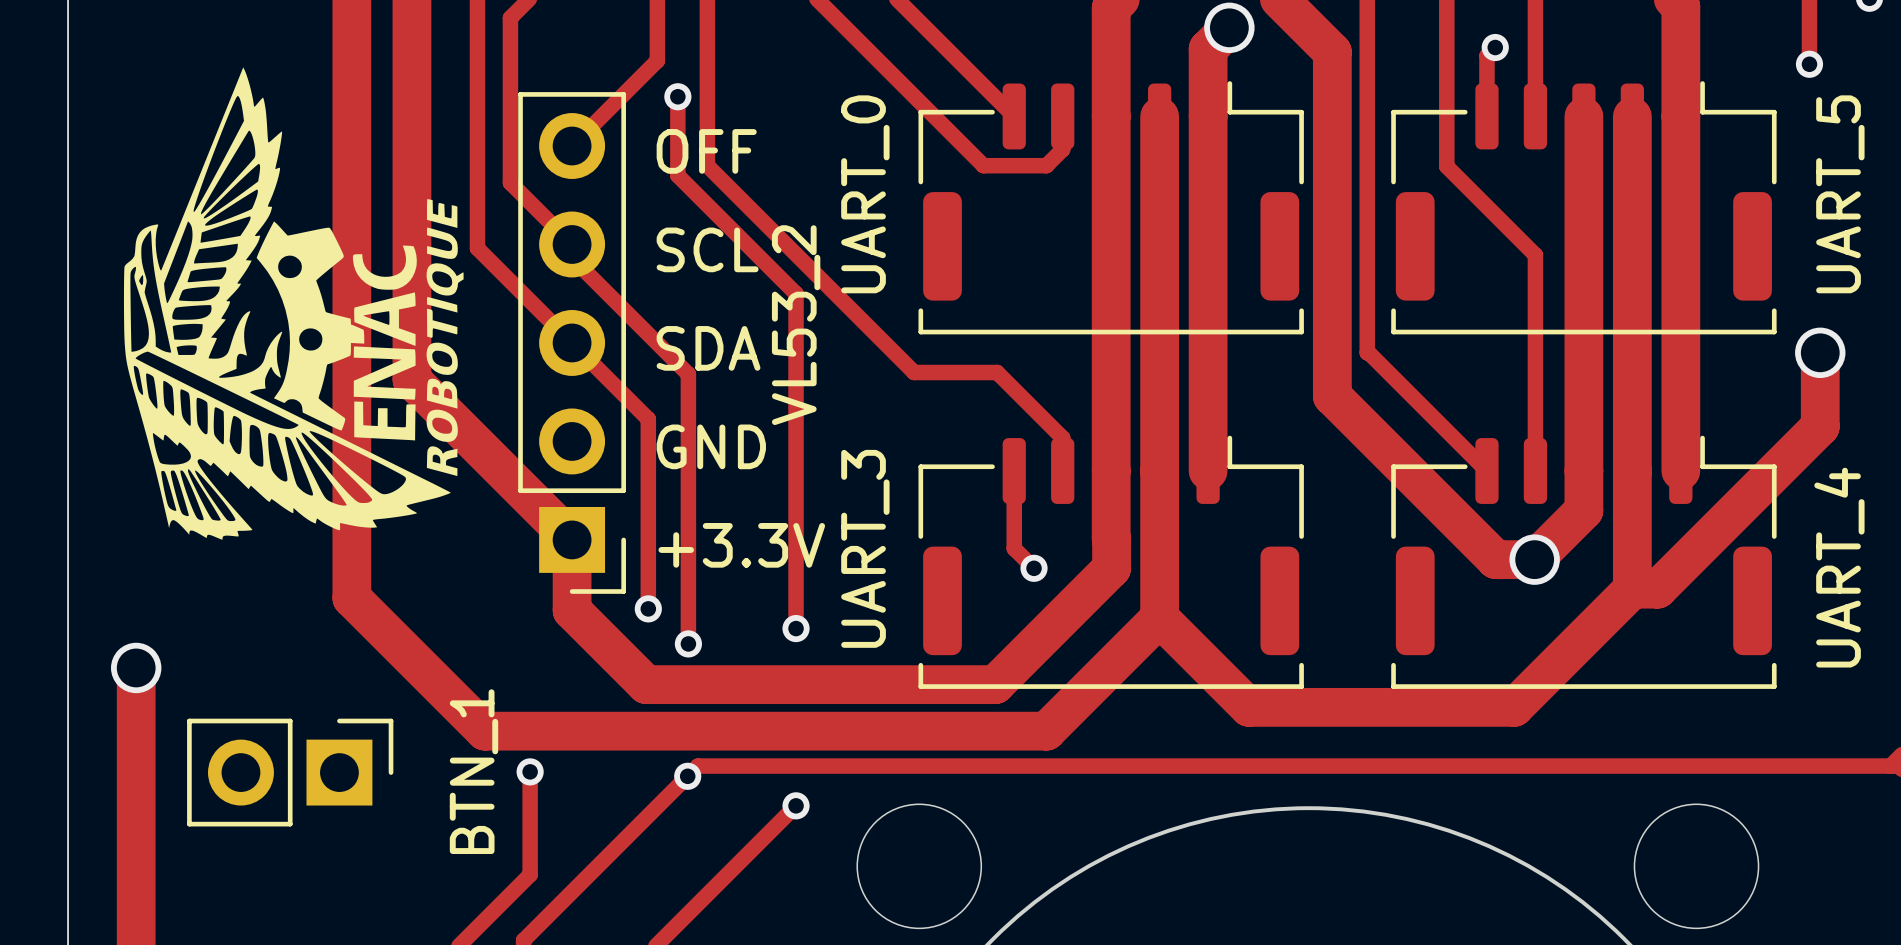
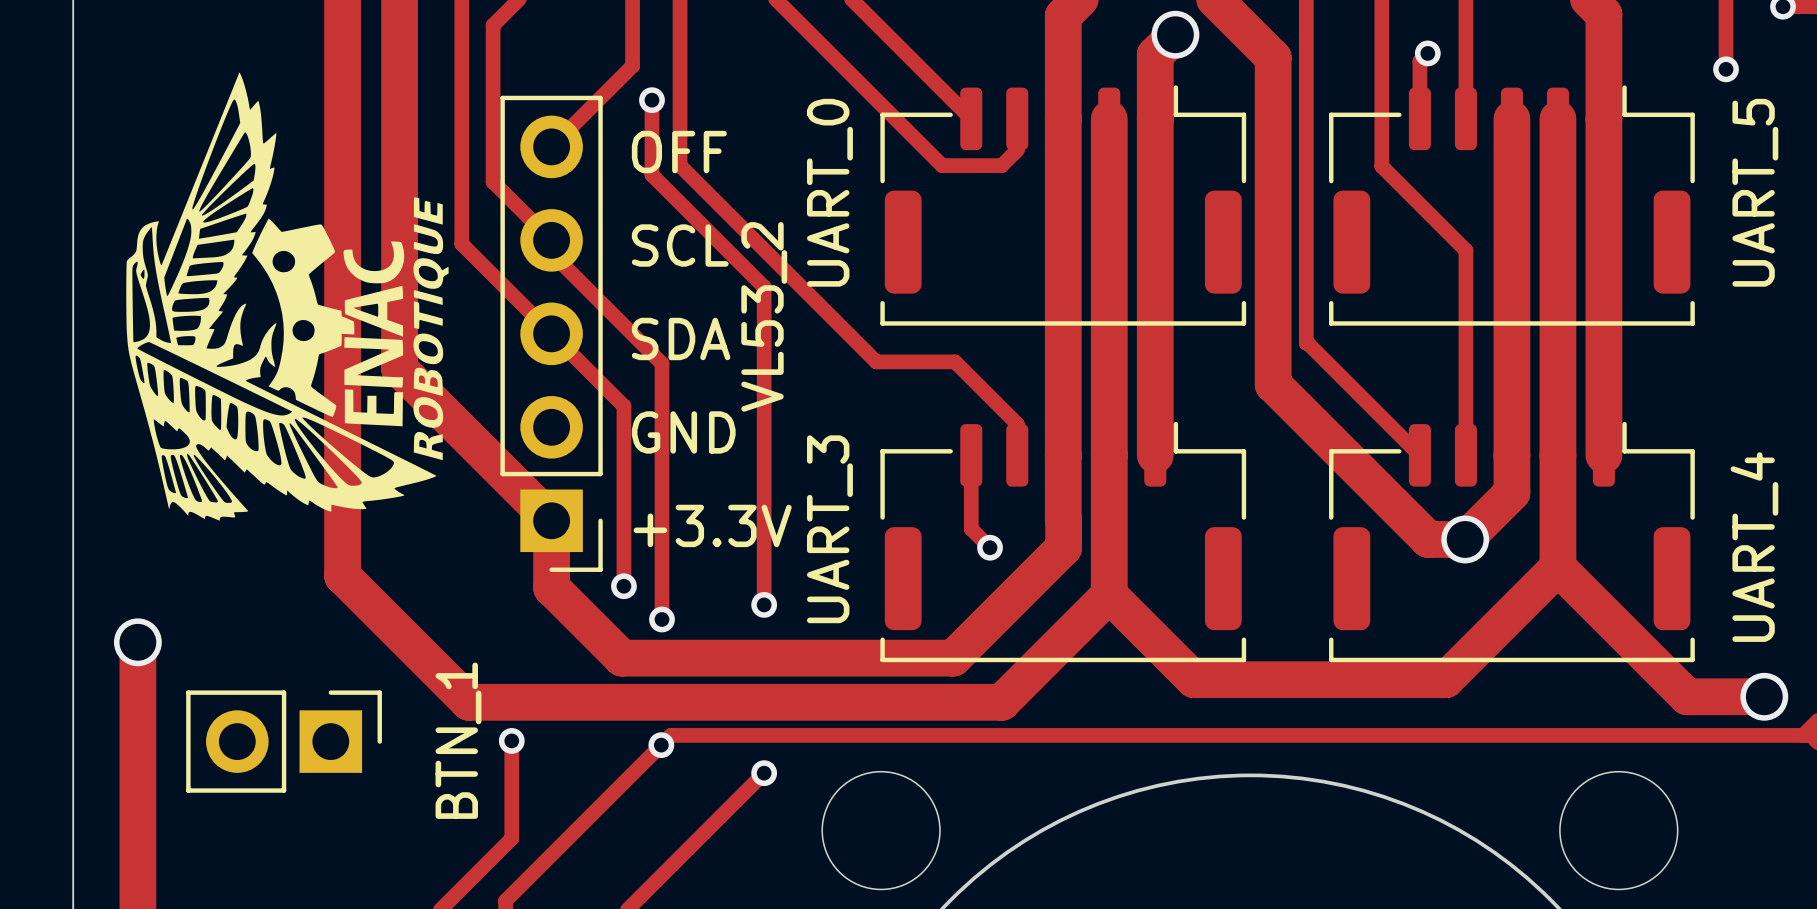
track: (1820, 352) (1820, 426) (1657, 589) (1632, 589) -> (1764, 696) (1687, 696) (1557, 567)
via: (1820, 352) -> none
via: none -> (1764, 696)

